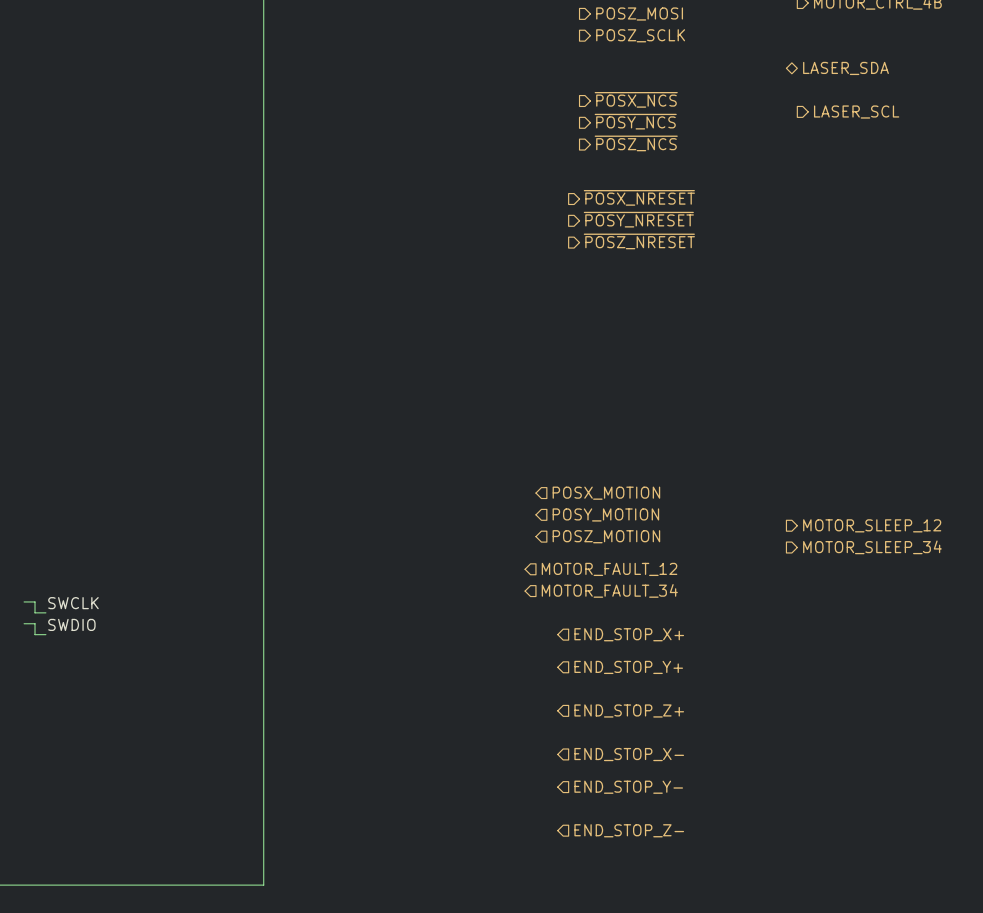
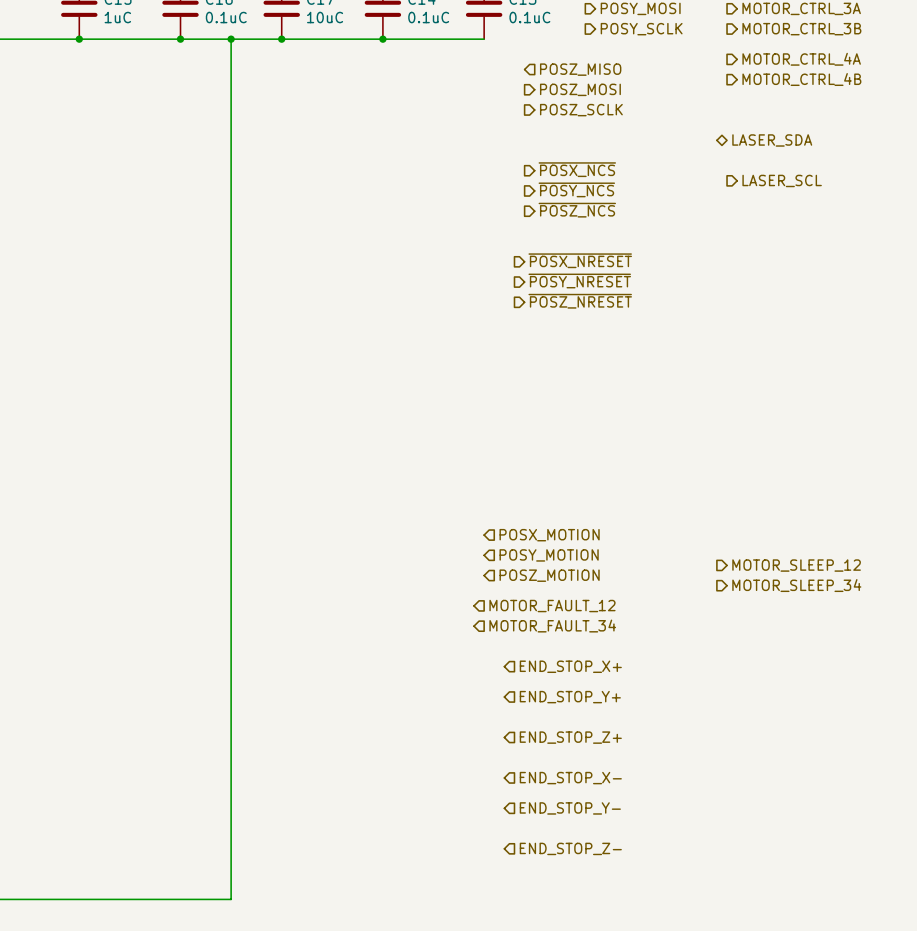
wire: (24, 601) (35, 601) (35, 612) (45, 612) -> none
label: SWCLK (73, 603) -> none
wire: (24, 623) (35, 623) (35, 634) (45, 634) -> none
label: SWDIO (71, 624) -> none

